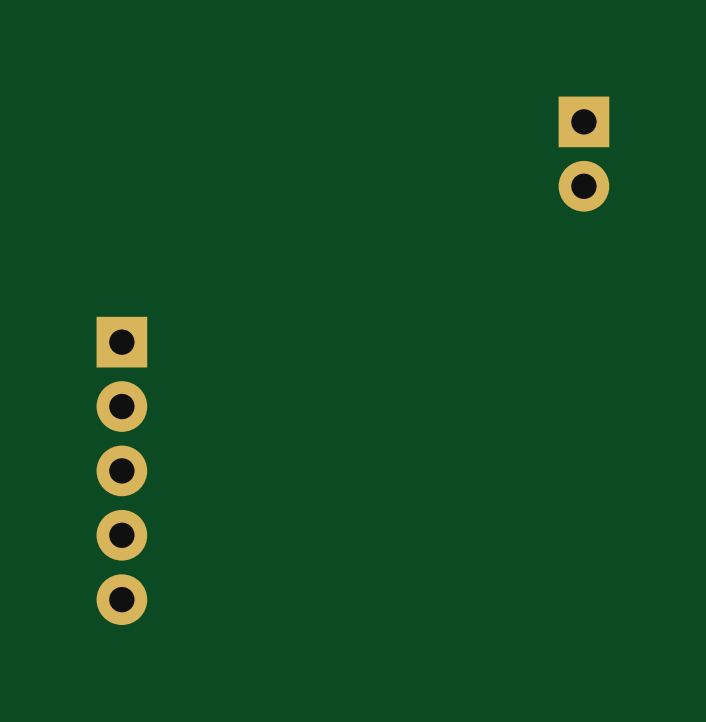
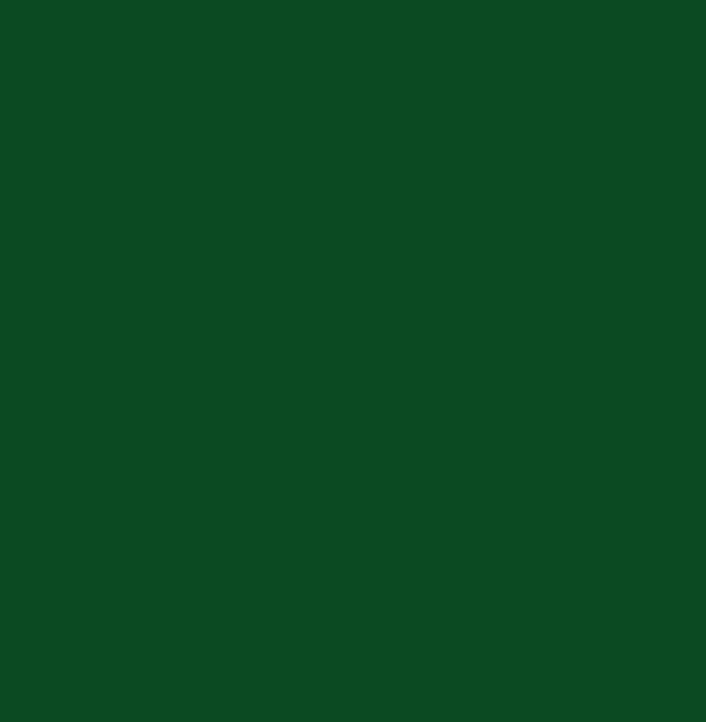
part: (583, 154) -> none
part: (121, 470) -> none

